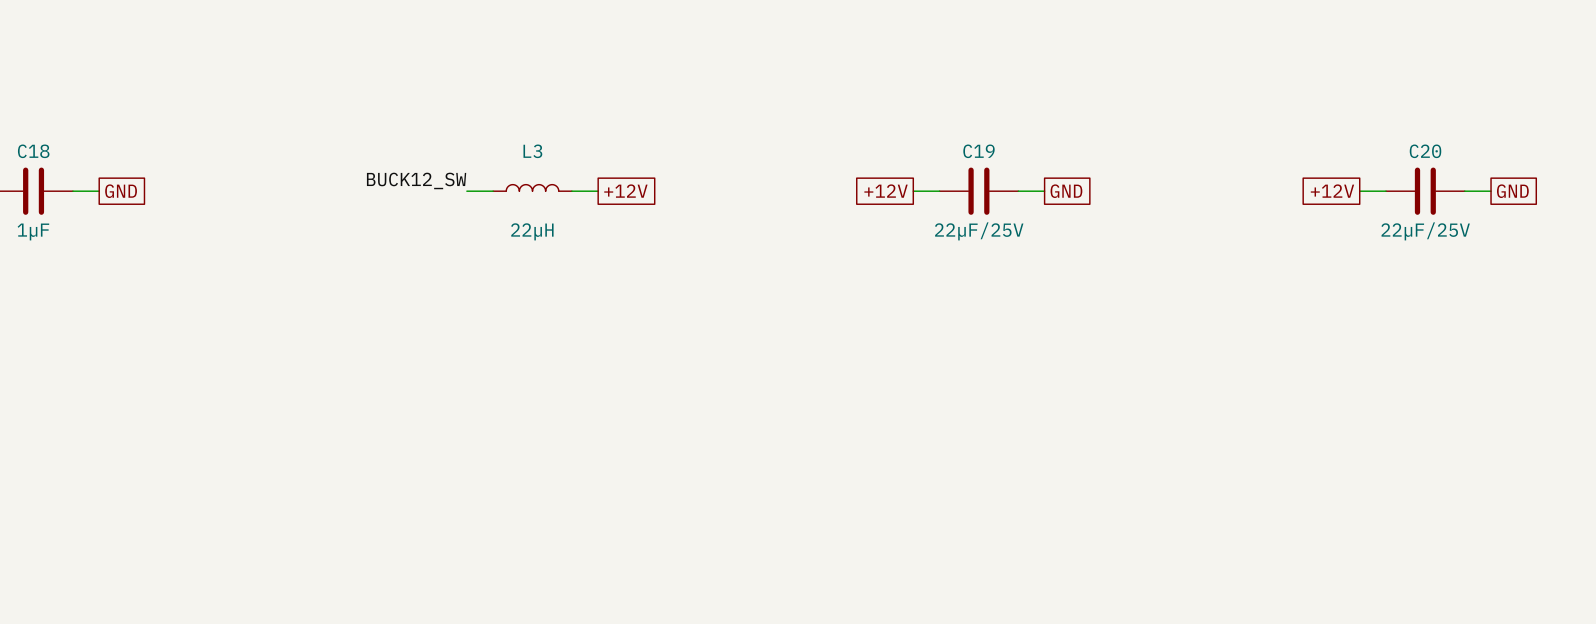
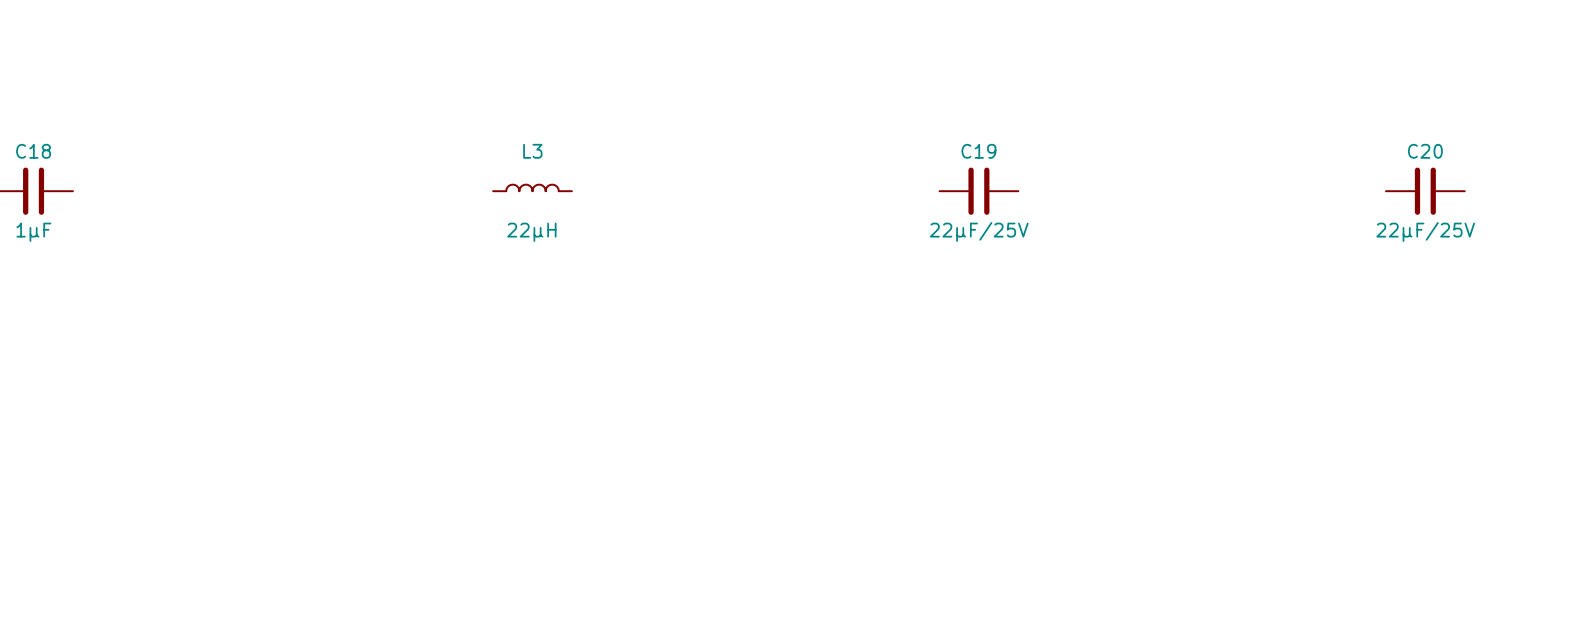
label: BUCK12_SW (416, 180) -> none
wire: (72, 191) (99, 191) -> none
global label: GND (121, 191) -> none
wire: (466, 191) (493, 191) -> none
wire: (571, 191) (598, 191) -> none
global label: +12V (625, 191) -> none
global label: +12V (886, 191) -> none
wire: (913, 191) (939, 191) -> none
wire: (1018, 191) (1044, 191) -> none
global label: GND (1066, 191) -> none
global label: +12V (1332, 191) -> none
wire: (1359, 191) (1385, 191) -> none
wire: (1464, 191) (1491, 191) -> none
global label: GND (1512, 191) -> none

